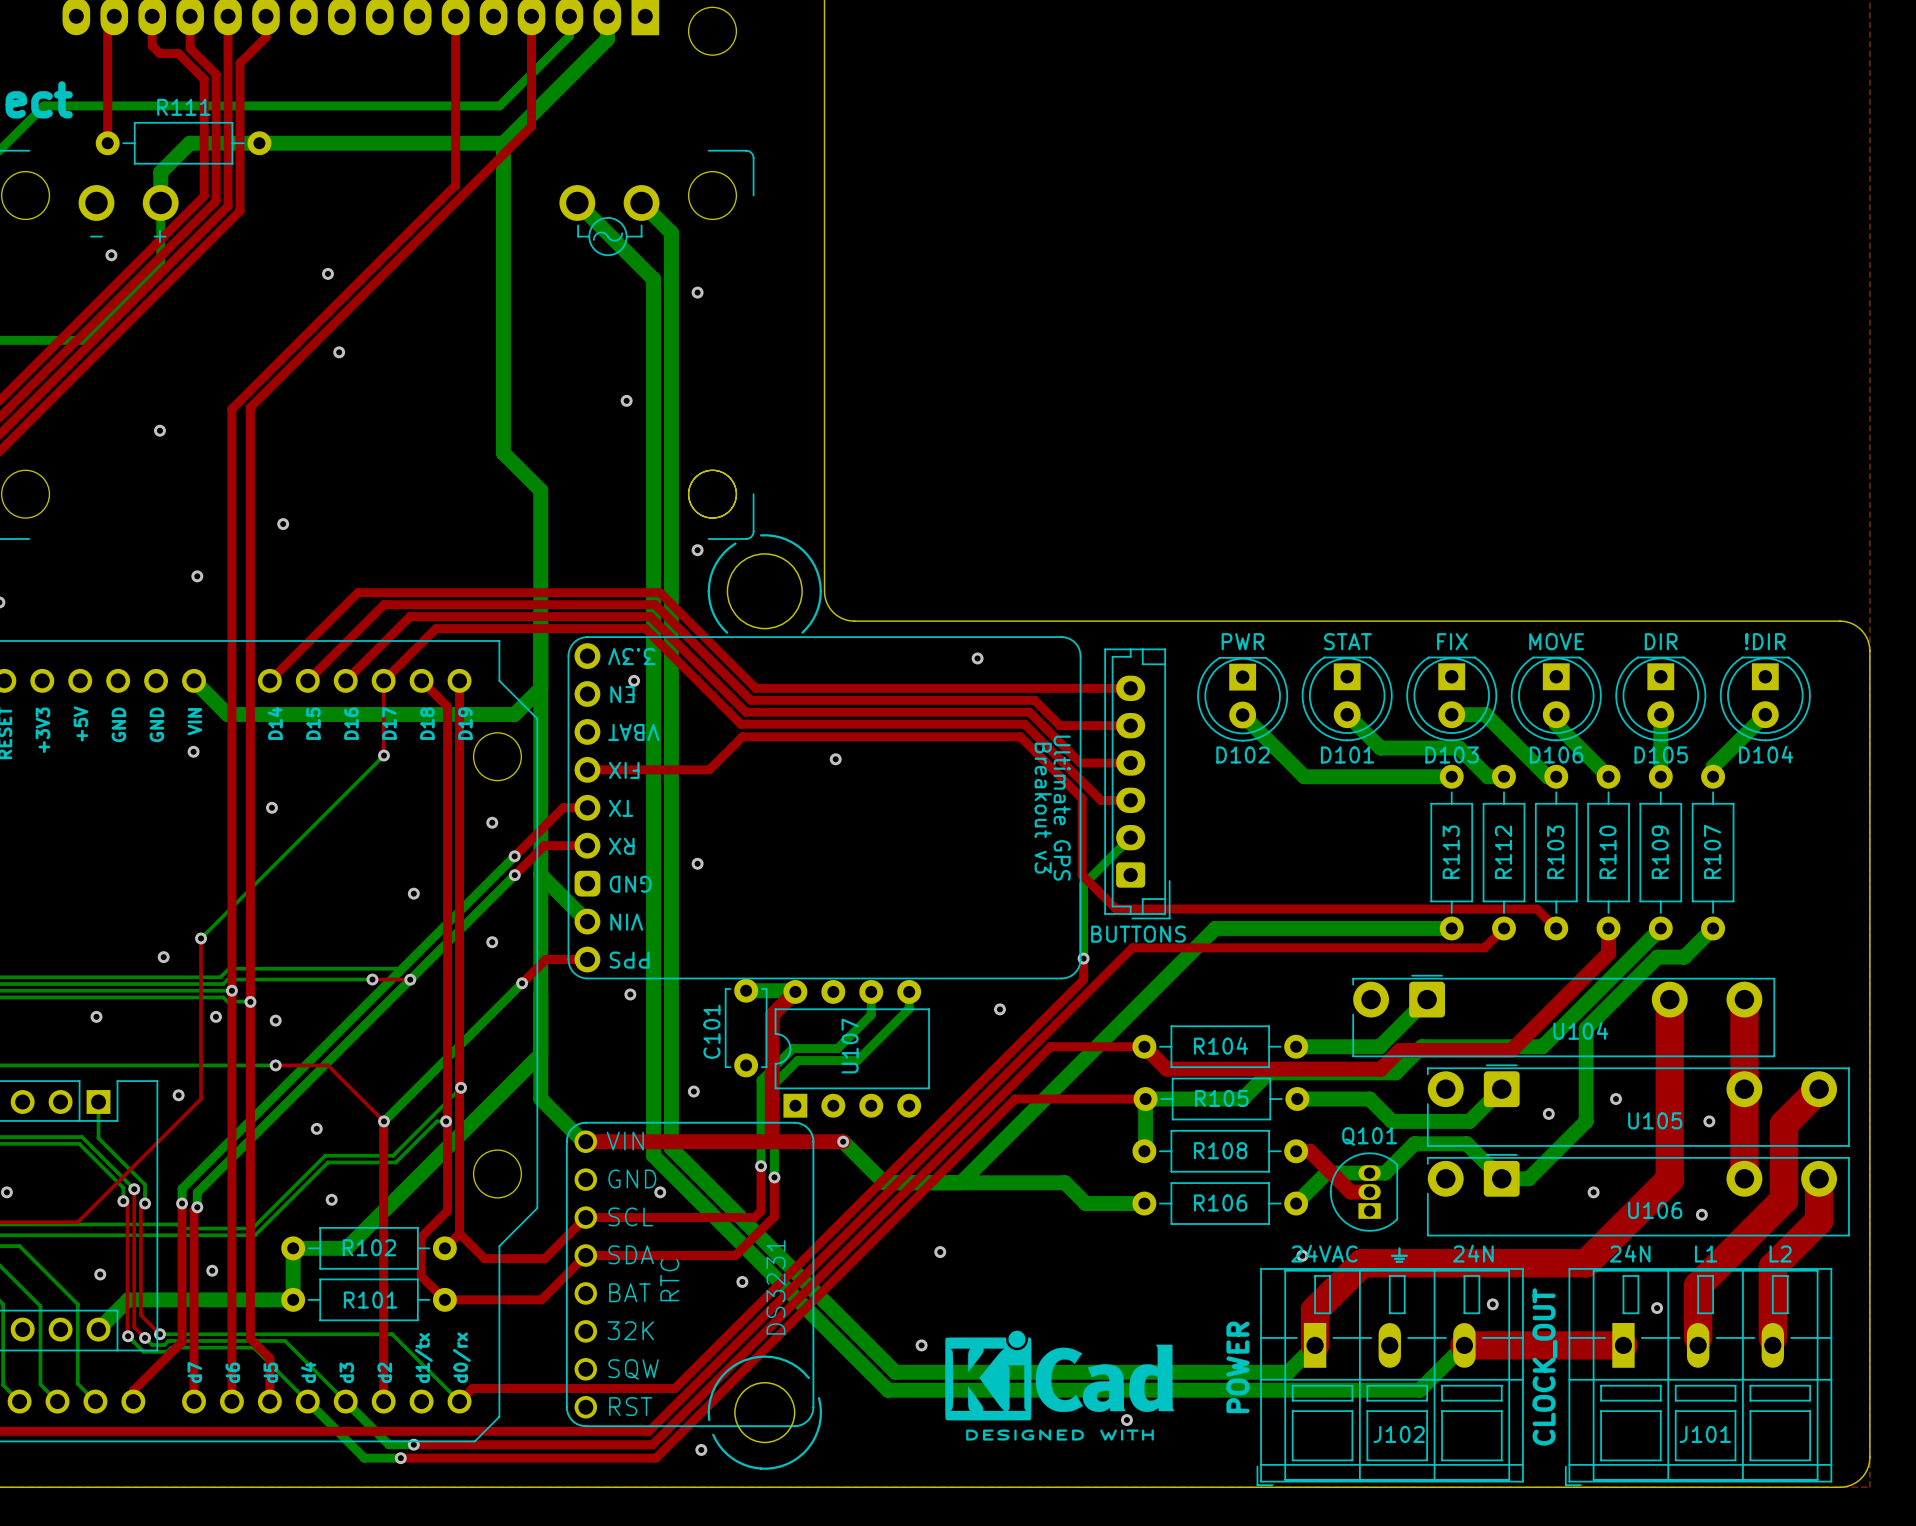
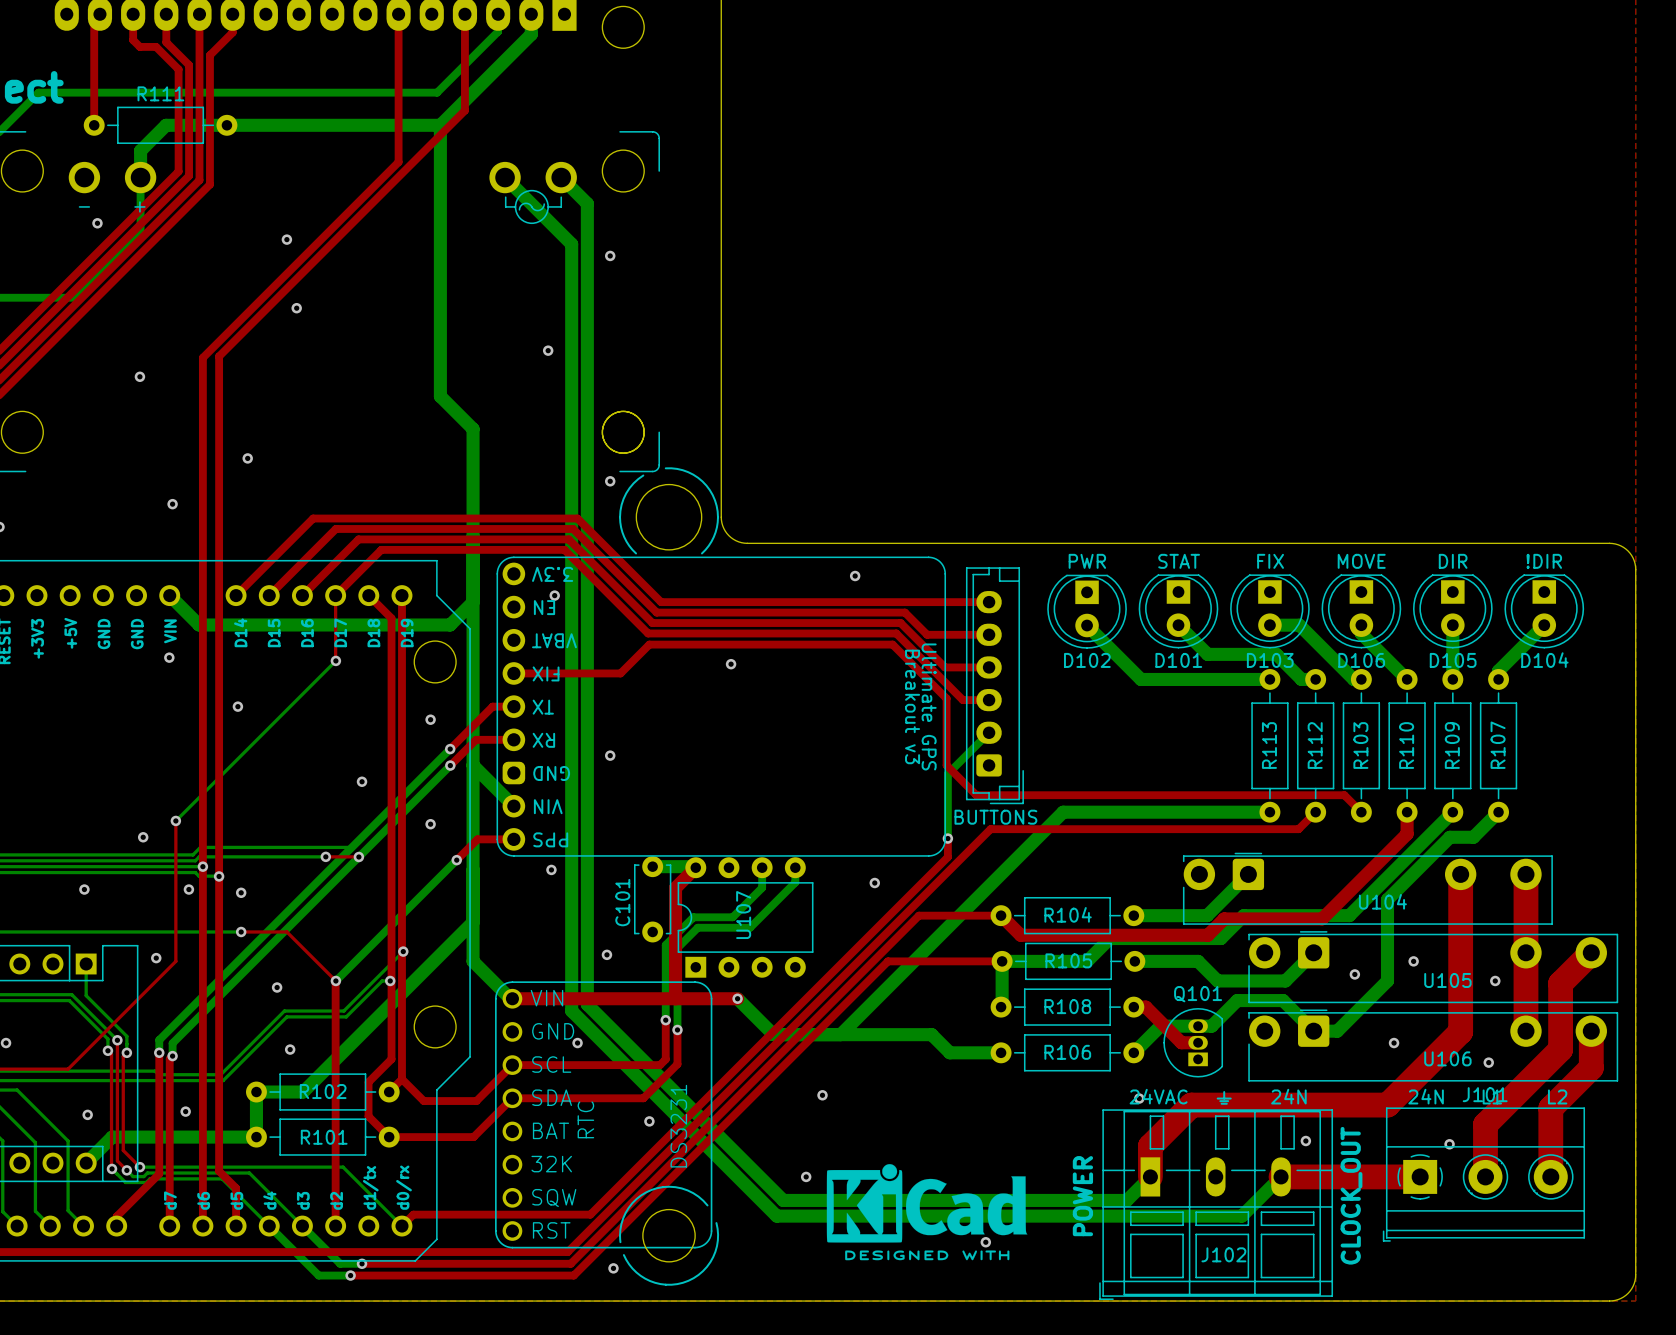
J101 footprint: [1564, 1268, 1833, 1487] -> [1382, 1107, 1586, 1242]
J101 name position: J101 (1705, 1434) -> J101 (1485, 1094)

